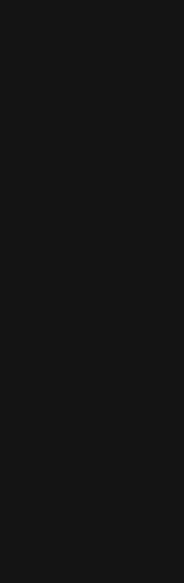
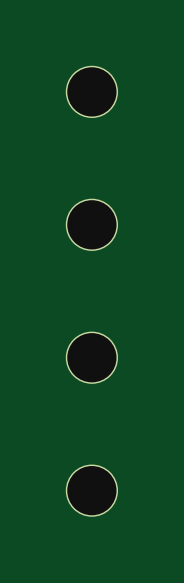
part: none -> (91, 91)
part: none -> (91, 224)
part: none -> (91, 357)
part: none -> (91, 490)

